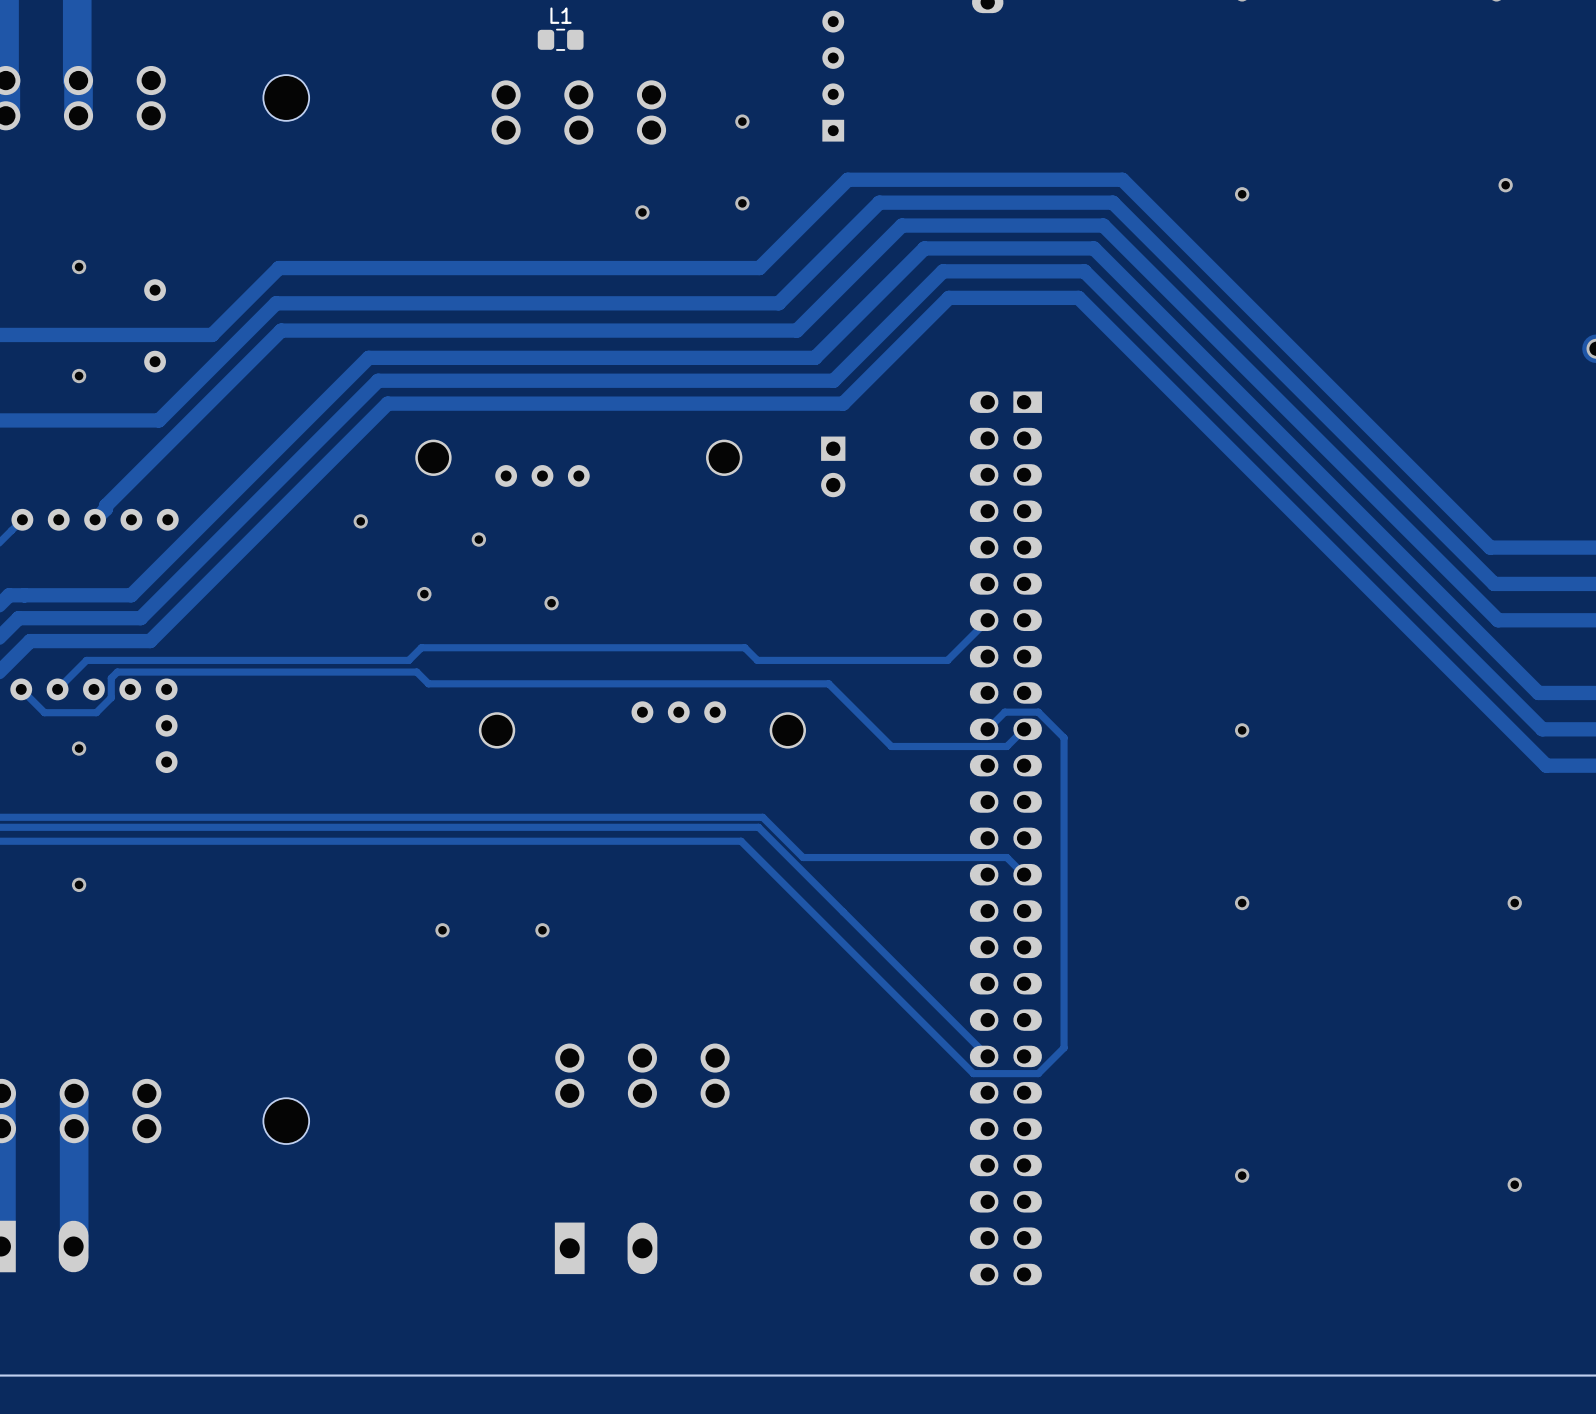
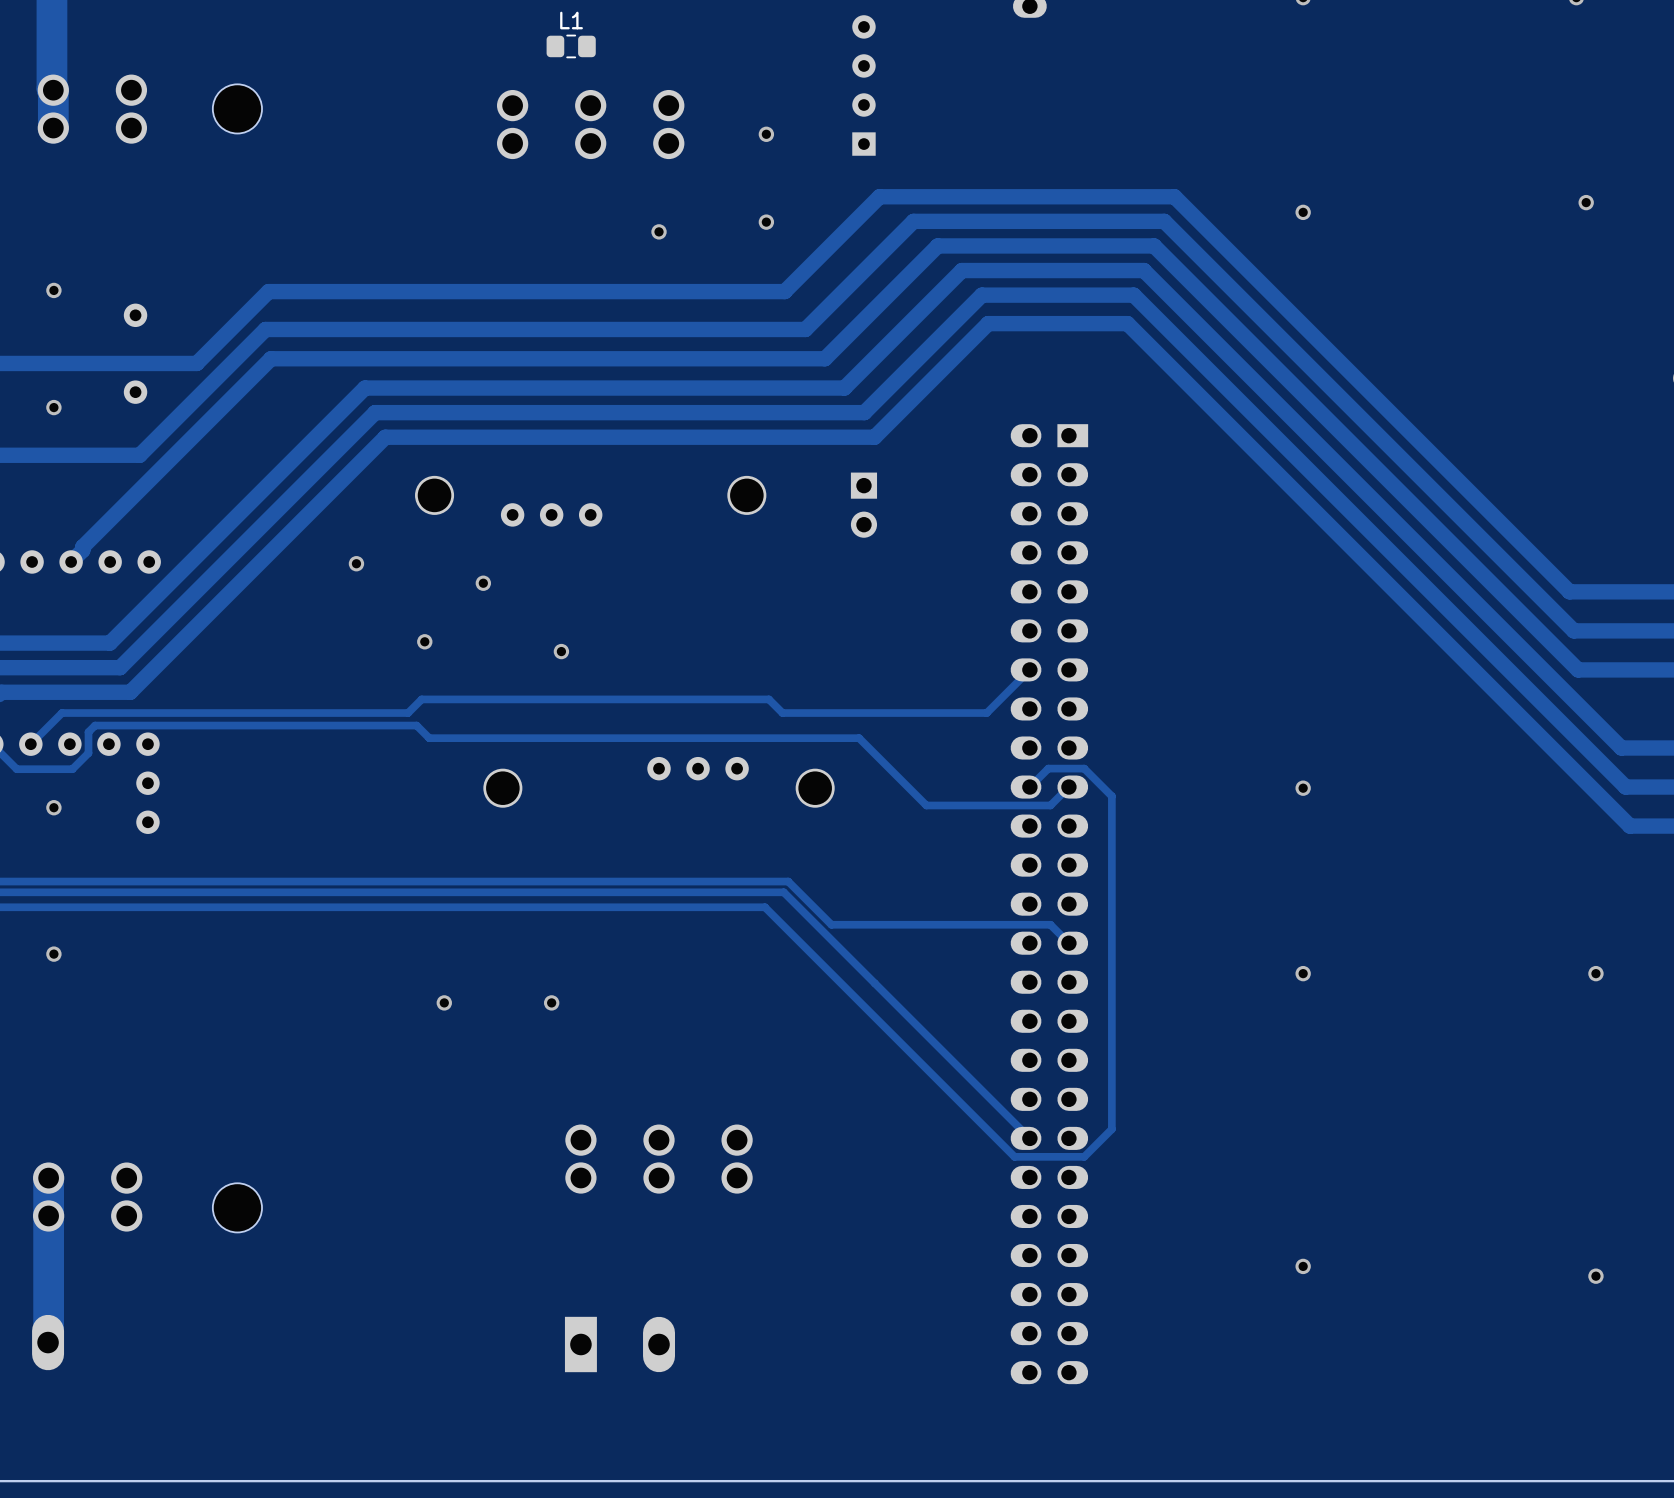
part position: (286, 97) -> (237, 108)
part position: (286, 1121) -> (237, 1207)

